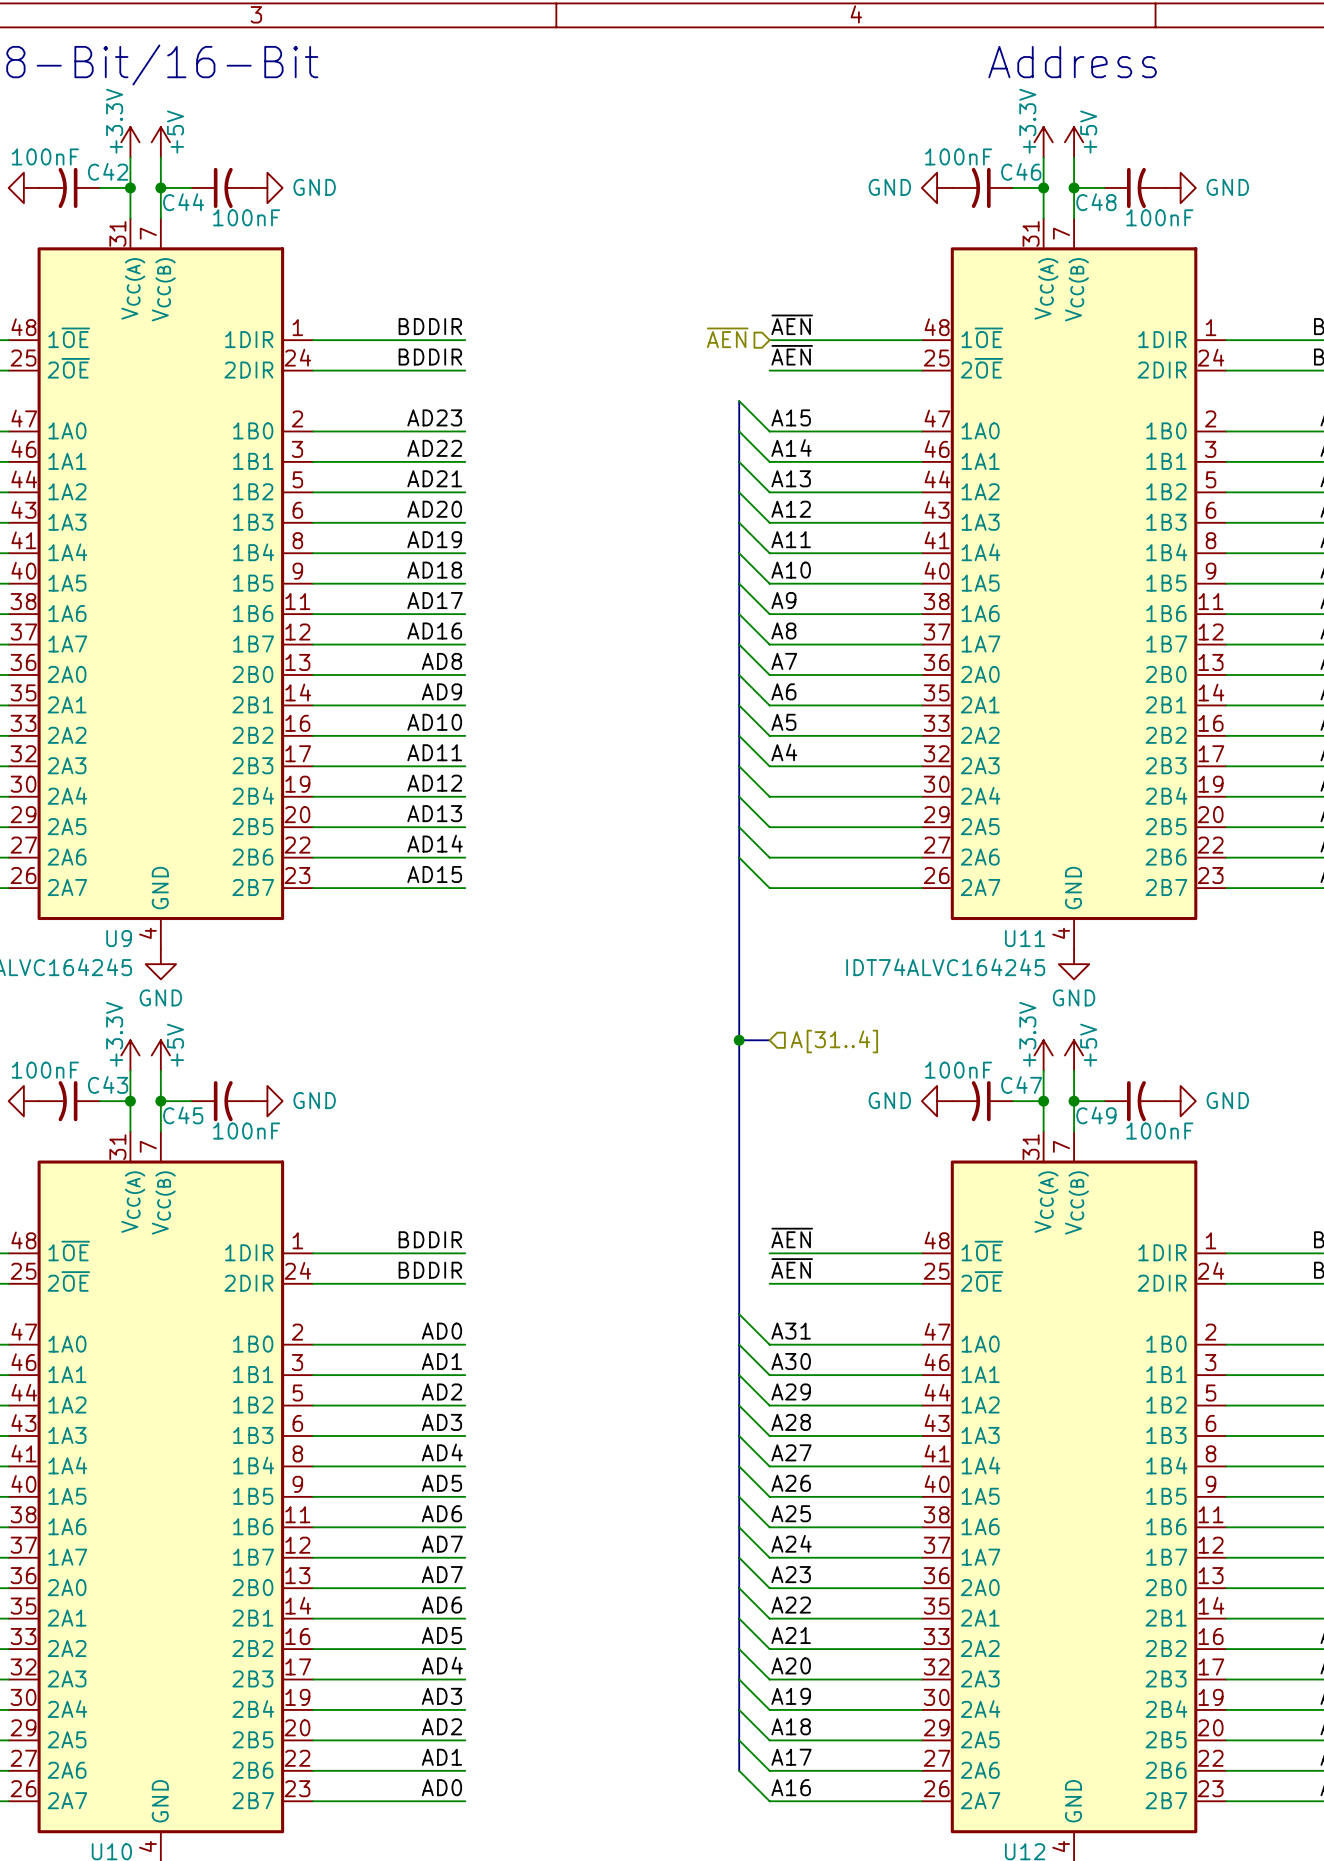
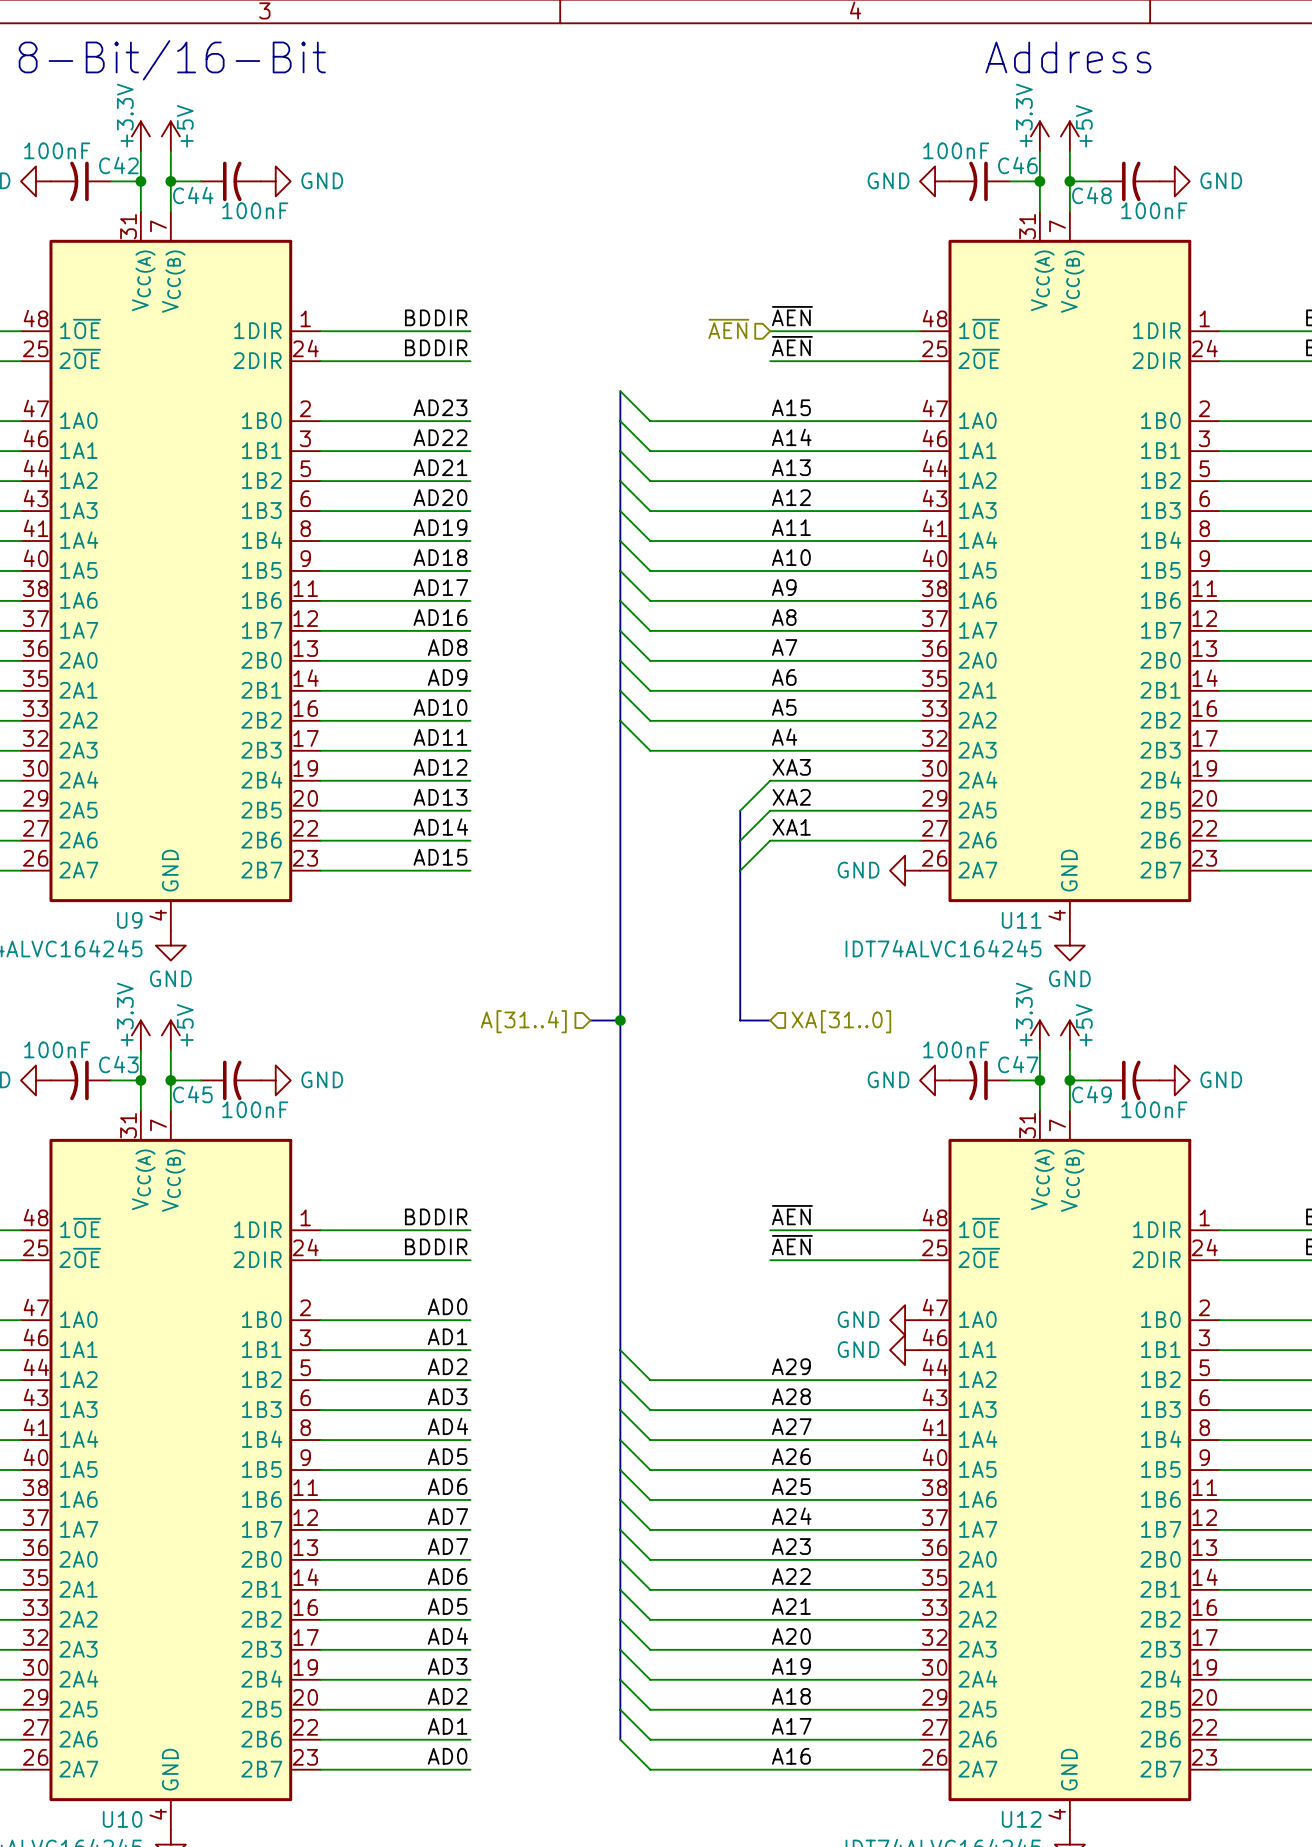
bus: none -> (620, 391) (620, 1739)
wire: (739, 401) (769, 431) -> (620, 391) (650, 421) (770, 421)
bus: (739, 401) (739, 827) -> none
wire: (739, 431) (769, 461) -> (620, 421) (650, 451) (770, 451)
wire: (739, 461) (769, 492) -> (620, 451) (650, 481) (770, 481)
wire: (739, 492) (769, 522) -> (620, 481) (650, 511) (770, 511)
wire: (739, 522) (769, 553) -> (620, 511) (650, 541) (770, 541)
wire: (739, 553) (769, 583) -> (620, 541) (650, 570) (770, 570)
wire: (739, 583) (769, 614) -> (620, 570) (650, 600) (770, 600)
wire: (739, 614) (769, 644) -> (620, 600) (650, 630) (770, 630)
wire: (739, 644) (769, 675) -> (620, 630) (650, 660) (770, 660)
wire: (739, 675) (769, 705) -> (620, 660) (650, 690) (770, 690)
wire: (739, 705) (769, 735) -> (620, 690) (650, 720) (770, 720)
wire: (739, 735) (769, 766) -> (620, 720) (650, 750) (770, 750)
wire: (739, 766) (769, 796) -> none
label: none -> XA3 (791, 767)
wire: (739, 796) (769, 827) -> (740, 840) (770, 810)
label: none -> XA2 (791, 797)
wire: (739, 827) (769, 857) -> (740, 810) (770, 780)
label: none -> XA1 (791, 827)
wire: (739, 857) (769, 888) (921, 888) -> none
wire: none -> (770, 840) (740, 870)
power symbol: none -> GND (905, 870)
bus: none -> (590, 1020) (620, 1020)
junction: none -> (620, 1020)
bus: (739, 1040) (739, 1770) -> none
junction: (739, 1040) -> none
hierarchical label: none -> A[31..4] (523, 1021)
hierarchical label: A[31..4] (834, 1041) -> XA[31..0] (841, 1021)
wire: (739, 1314) (769, 1344) (921, 1344) -> none
label: A31 (791, 1331) -> none
wire: (739, 1344) (769, 1375) (921, 1375) -> none
power symbol: none -> GND (905, 1320)
label: A30 (791, 1361) -> none
wire: (739, 1375) (769, 1405) -> (620, 1350) (650, 1380) (770, 1380)
power symbol: none -> GND (905, 1350)
wire: (739, 1405) (769, 1435) -> (620, 1380) (650, 1410) (770, 1410)
wire: (739, 1435) (769, 1466) -> (620, 1410) (650, 1440) (770, 1440)
wire: (739, 1466) (769, 1496) -> (620, 1440) (650, 1470) (770, 1470)
wire: (739, 1496) (769, 1527) -> (620, 1470) (650, 1499) (770, 1499)
wire: (739, 1527) (769, 1557) -> (620, 1499) (650, 1529) (770, 1529)
wire: (739, 1557) (769, 1588) -> (620, 1529) (650, 1559) (770, 1559)
wire: (739, 1588) (769, 1618) -> (620, 1559) (650, 1589) (770, 1589)
wire: (739, 1618) (769, 1649) -> (620, 1589) (650, 1619) (770, 1619)
wire: (739, 1649) (769, 1679) -> (620, 1619) (650, 1649) (770, 1649)
wire: (739, 1679) (769, 1709) -> (620, 1649) (650, 1679) (770, 1679)
wire: (739, 1709) (769, 1740) -> (620, 1679) (650, 1709) (770, 1709)
wire: (739, 1740) (769, 1770) -> (620, 1709) (650, 1739) (770, 1739)
wire: (739, 1770) (769, 1801) -> (620, 1739) (650, 1769) (770, 1769)

